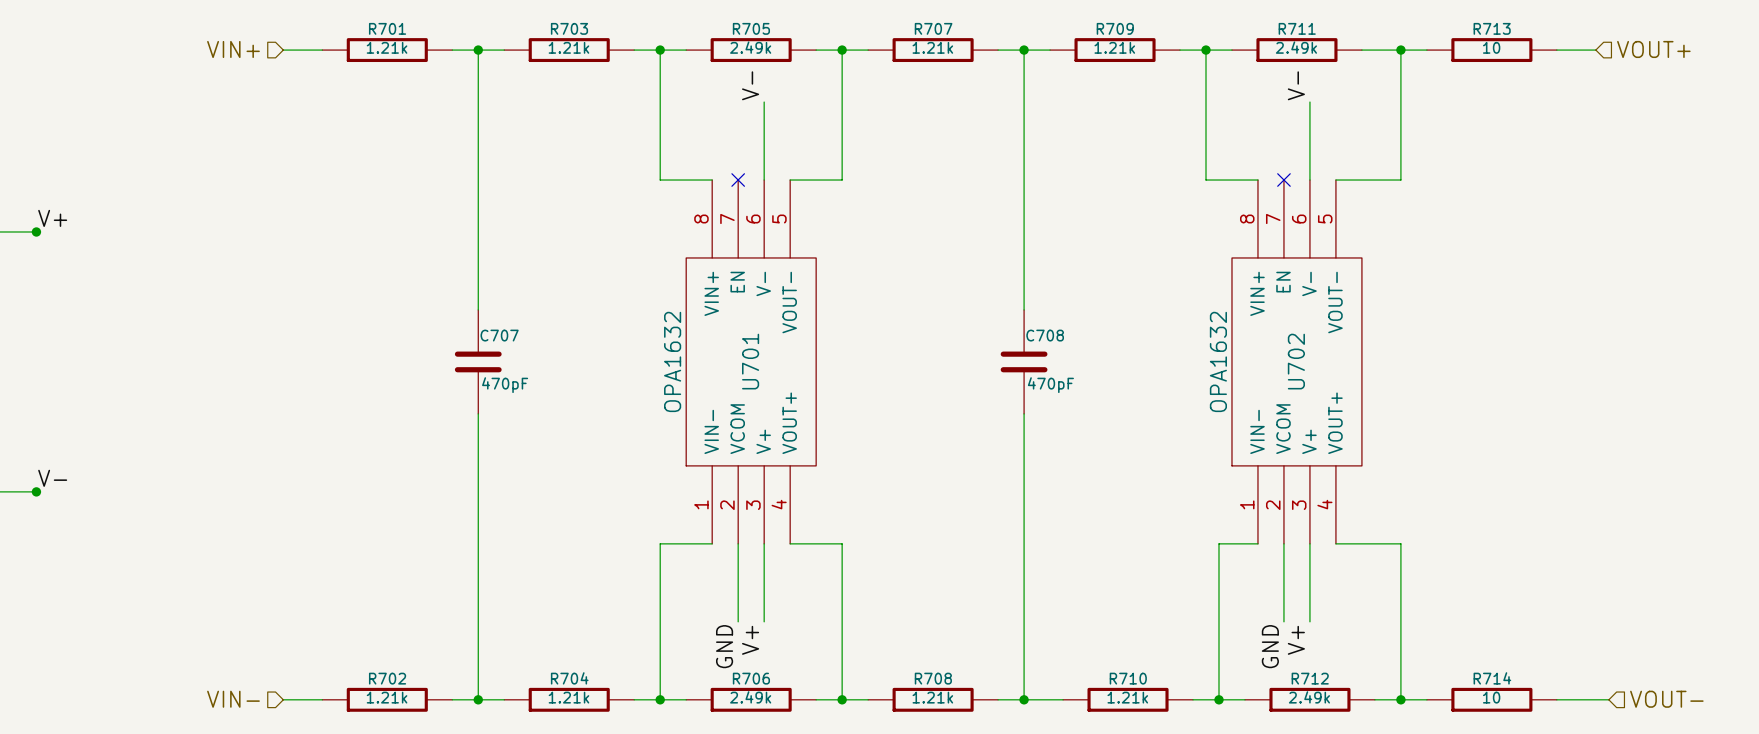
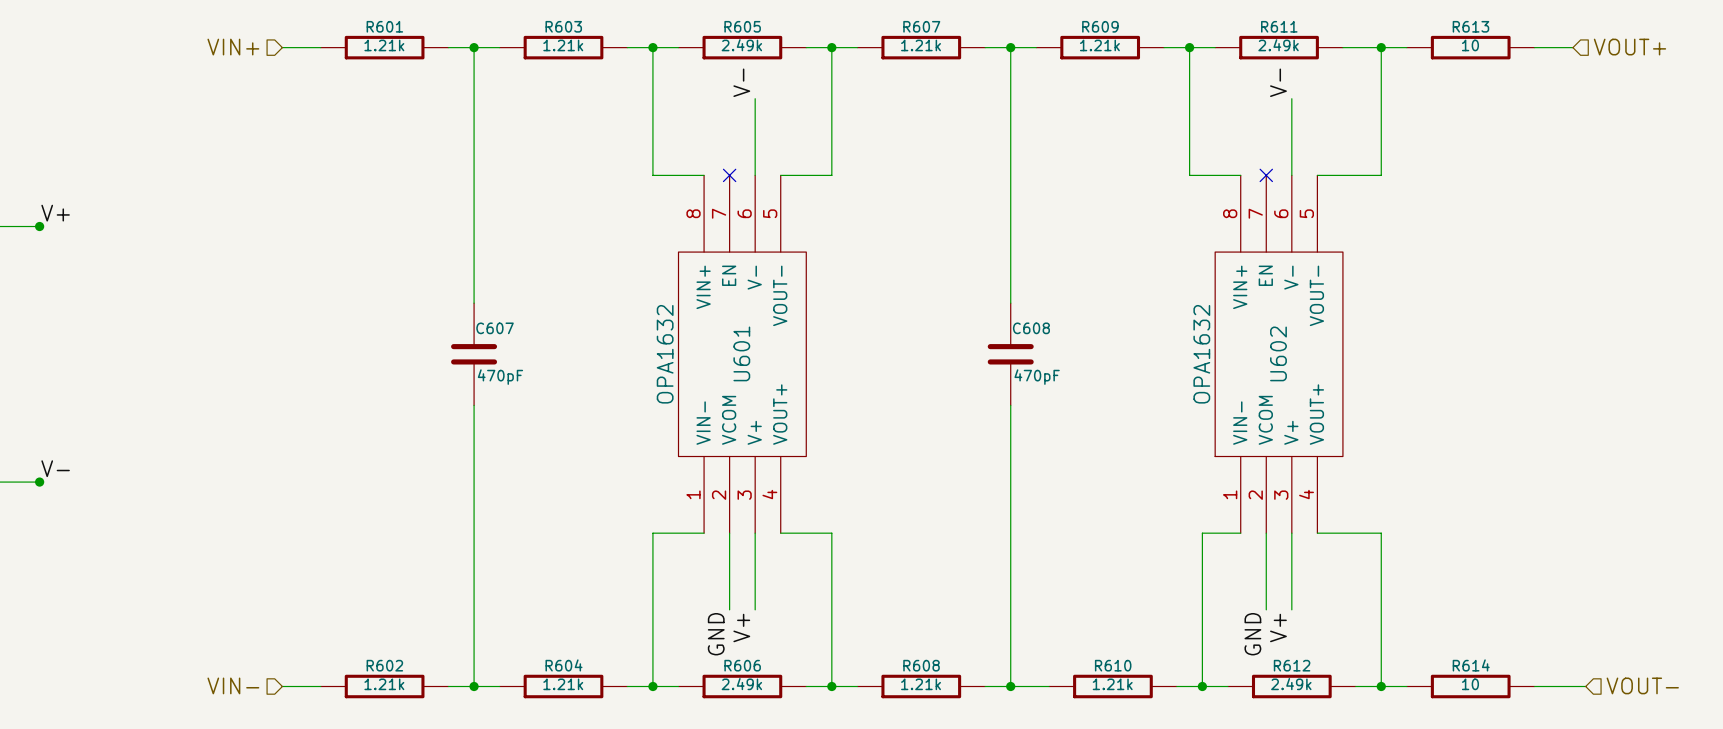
R701 name: R701 (387, 28) -> R601 (384, 26)
R703 name: R703 (569, 28) -> R603 (563, 26)
R705 name: R705 (751, 28) -> R605 (742, 26)
R707 name: R707 (933, 28) -> R607 (921, 26)
R709 name: R709 (1115, 28) -> R609 (1100, 26)
R711 name: R711 (1297, 28) -> R611 (1279, 26)
R713 name: R713 (1492, 28) -> R613 (1470, 26)
C707 name: C707 (499, 335) -> C607 (495, 328)
C708 name: C708 (1045, 335) -> C608 (1031, 328)
U701 name: U701 (750, 361) -> U601 (741, 353)
U702 name: U702 (1296, 361) -> U602 (1278, 353)
R702 name: R702 (387, 678) -> R602 (384, 665)
R704 name: R704 (569, 678) -> R604 (563, 665)
R706 name: R706 (751, 678) -> R606 (742, 665)
R708 name: R708 (933, 678) -> R608 (921, 665)
R710 name: R710 (1128, 678) -> R610 (1113, 665)
R712 name: R712 (1310, 678) -> R612 (1292, 665)
R714 name: R714 (1492, 678) -> R614 (1471, 665)

